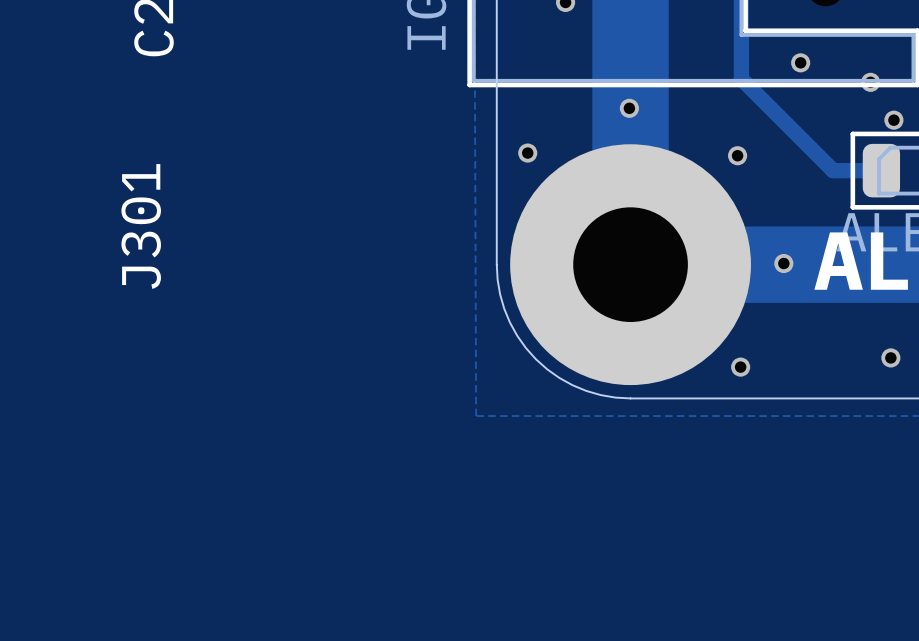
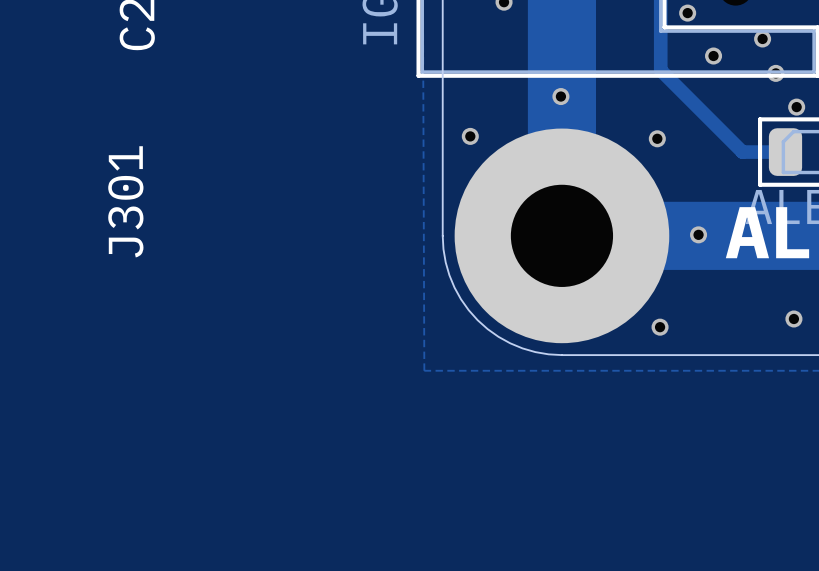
via: none -> (687, 13)
via: none -> (762, 38)

